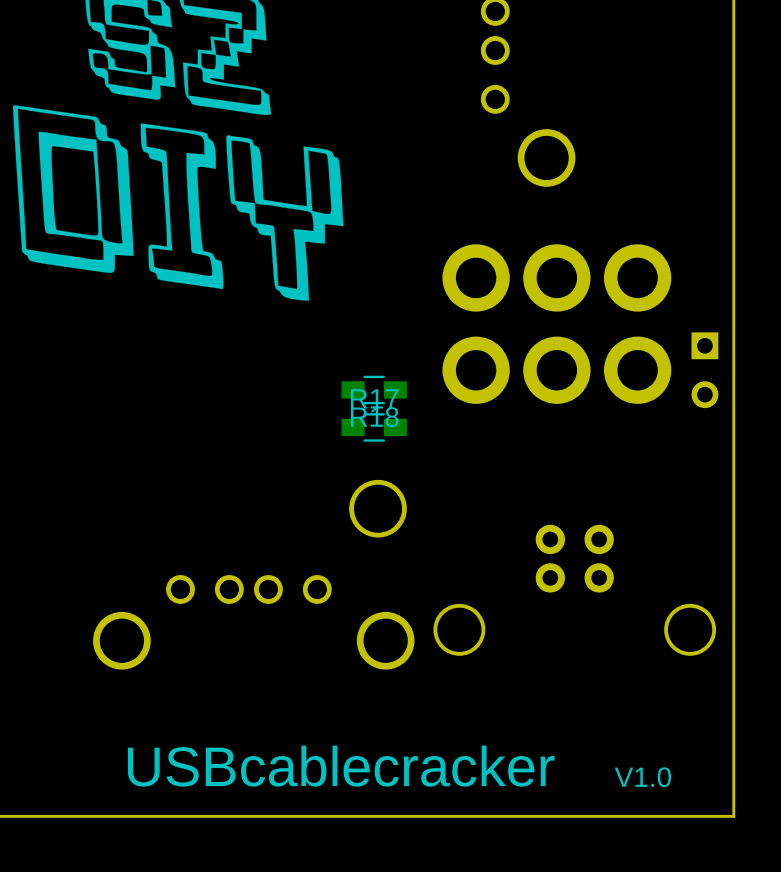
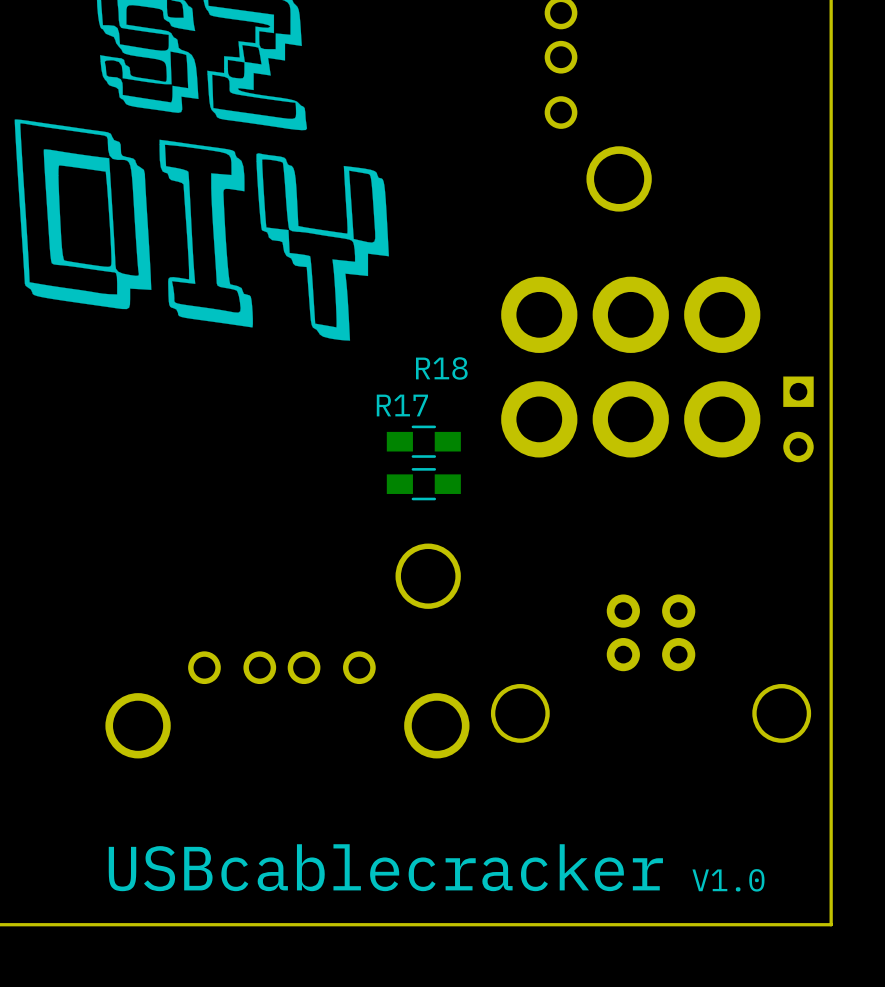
R17 name position: R17 (374, 398) -> R17 (402, 405)
R18 name position: R18 (374, 417) -> R18 (441, 368)

